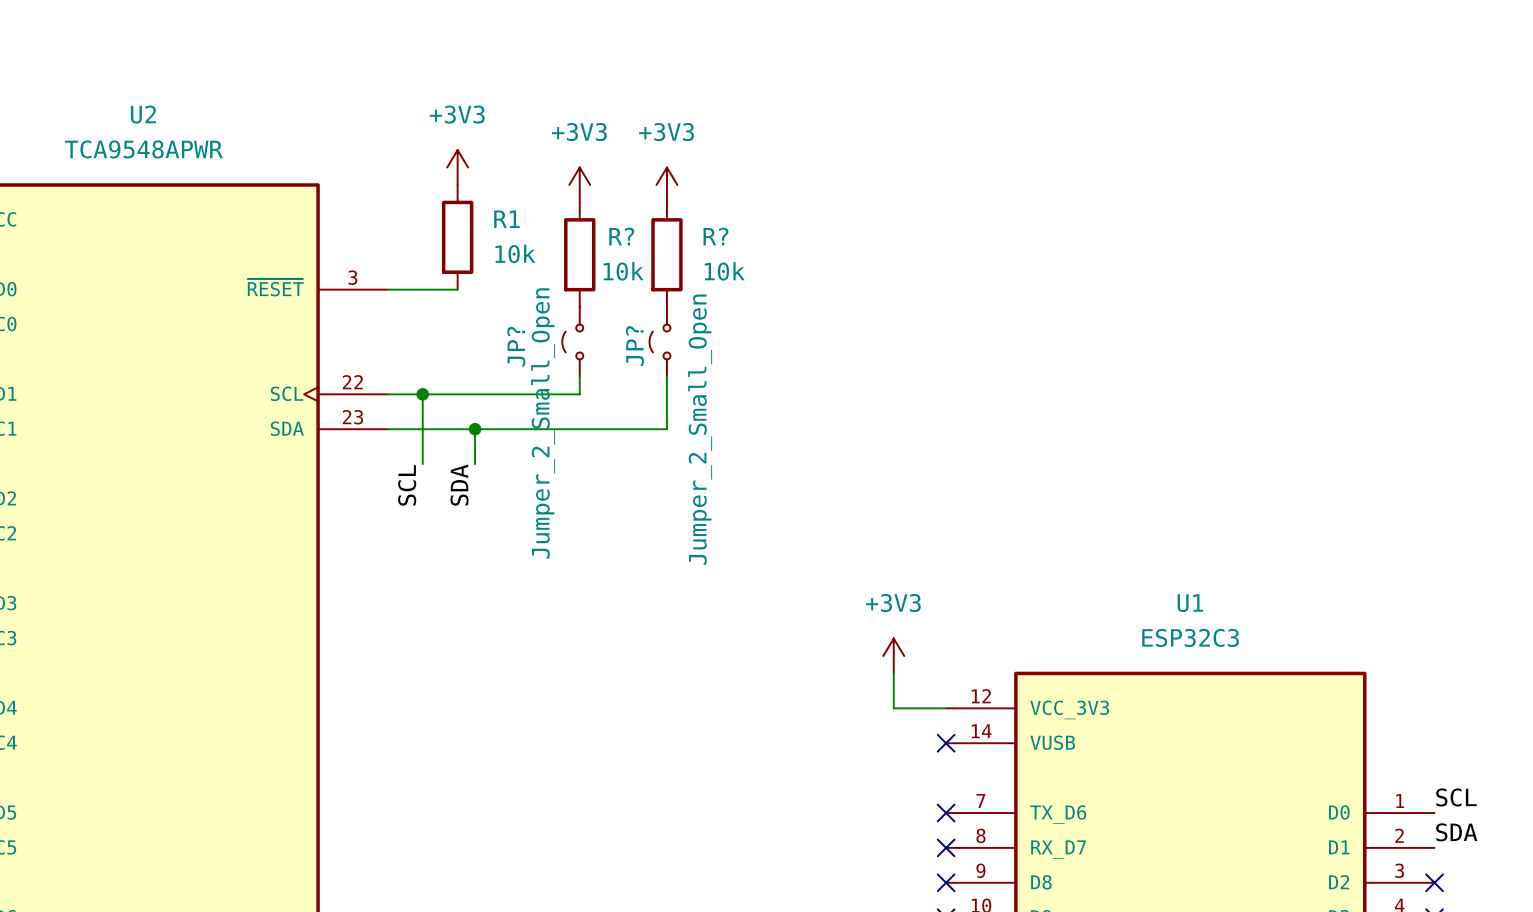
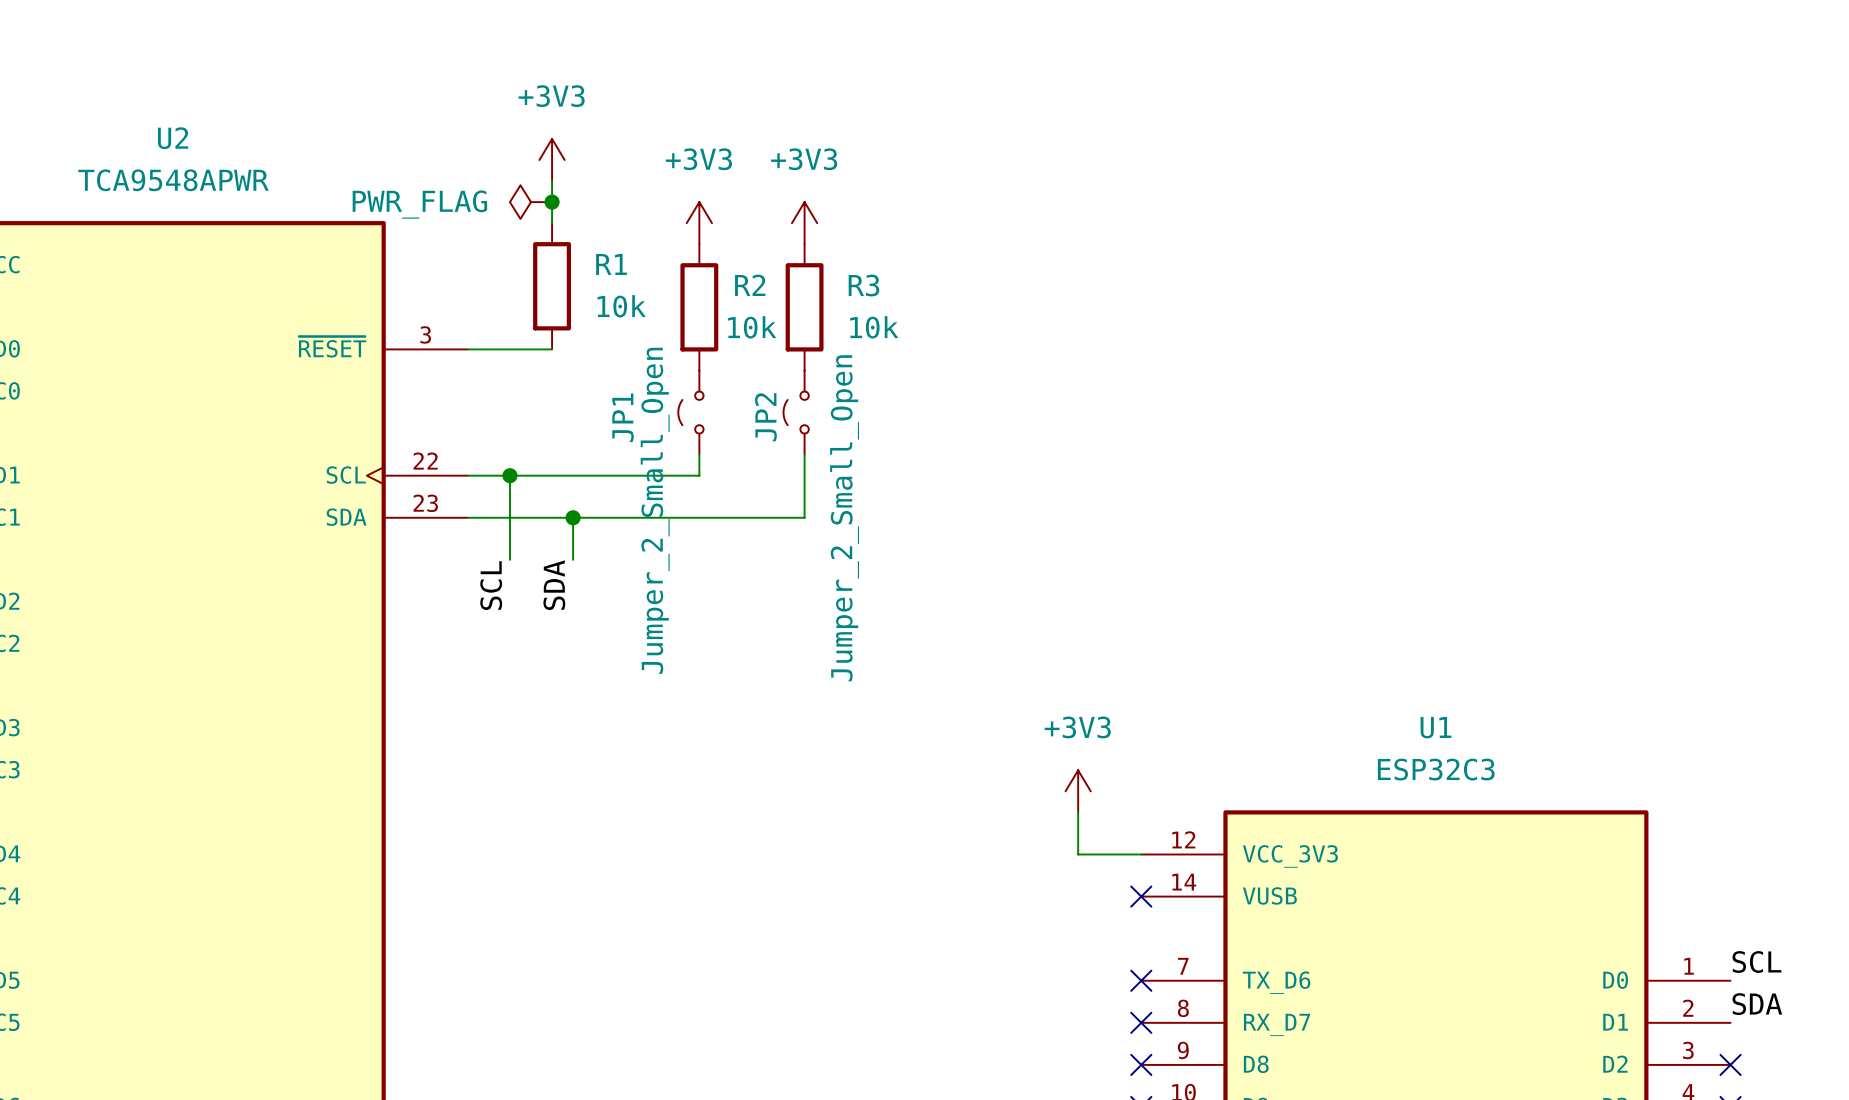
power symbol: none -> PWR_FLAG (531, 202)
power symbol position: +3V3 (457, 167) -> +3V3 (552, 160)
junction: none -> (552, 202)
R? name: R? (621, 236) -> R2 (750, 285)
R? name: R? (715, 236) -> R3 (863, 285)
JP? name: JP? (634, 345) -> JP2 (765, 417)
JP? name: JP? (516, 346) -> JP1 (623, 417)

